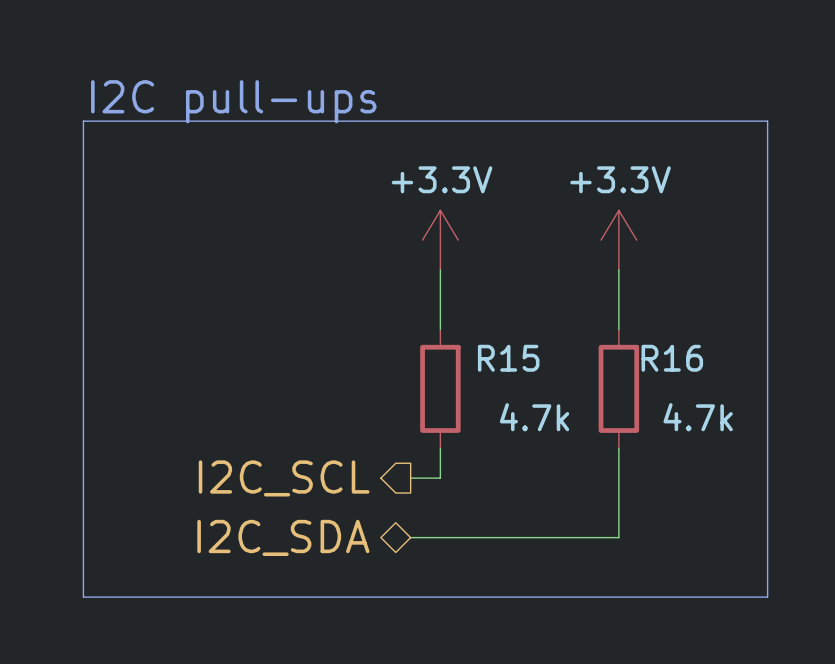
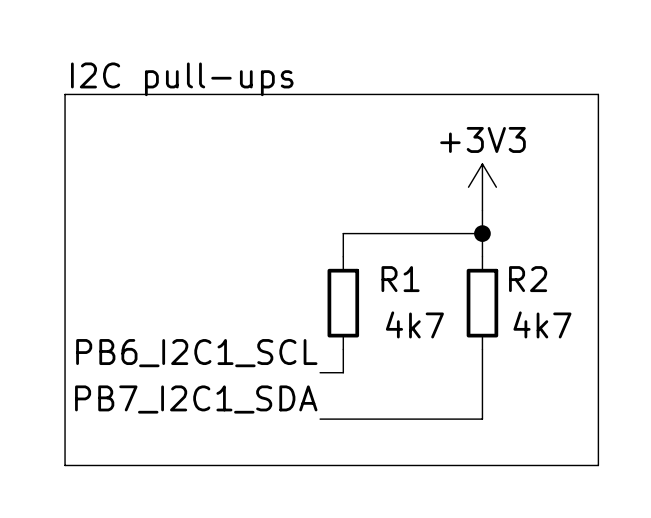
power symbol: +3.3V (440, 240) -> none
power symbol: +3.3V (618, 240) -> +3V3 (482, 187)
wire: (440, 269) (440, 299) -> (482, 233) (343, 233)
junction: none -> (482, 233)
R15 name: R15 (508, 358) -> R1 (400, 279)
R16 name: R16 (672, 358) -> R2 (528, 279)
R15 value: 4.7k (534, 417) -> 4k7 (414, 324)
R16 value: 4.7k (698, 417) -> 4k7 (542, 324)
label: none -> PB6_I2C1_SCL (196, 353)
hierarchical label: I2C_SCL (284, 478) -> none
label: none -> PB7_I2C1_SDA (196, 399)
hierarchical label: I2C_SDA (283, 537) -> none

